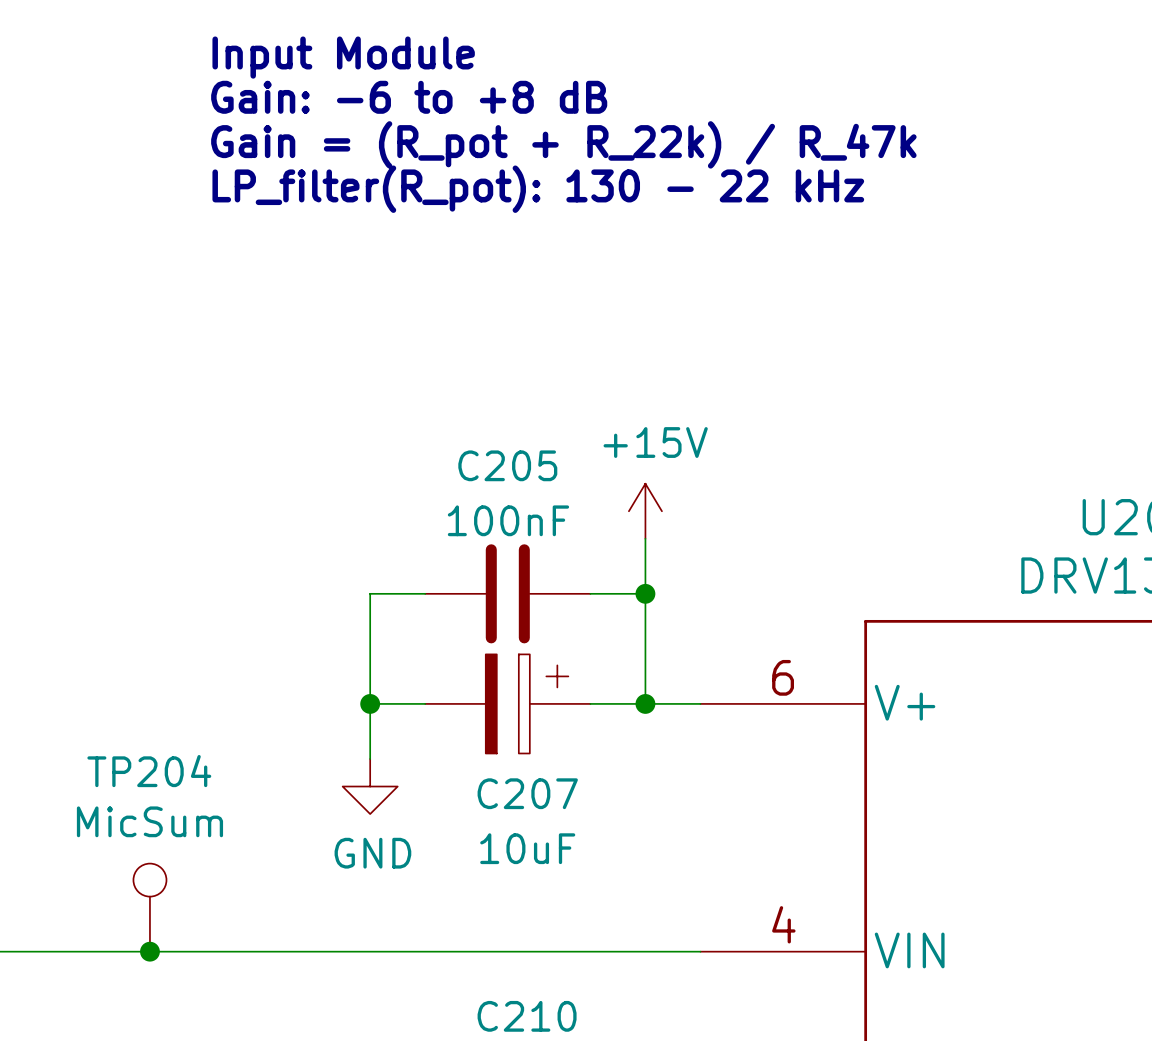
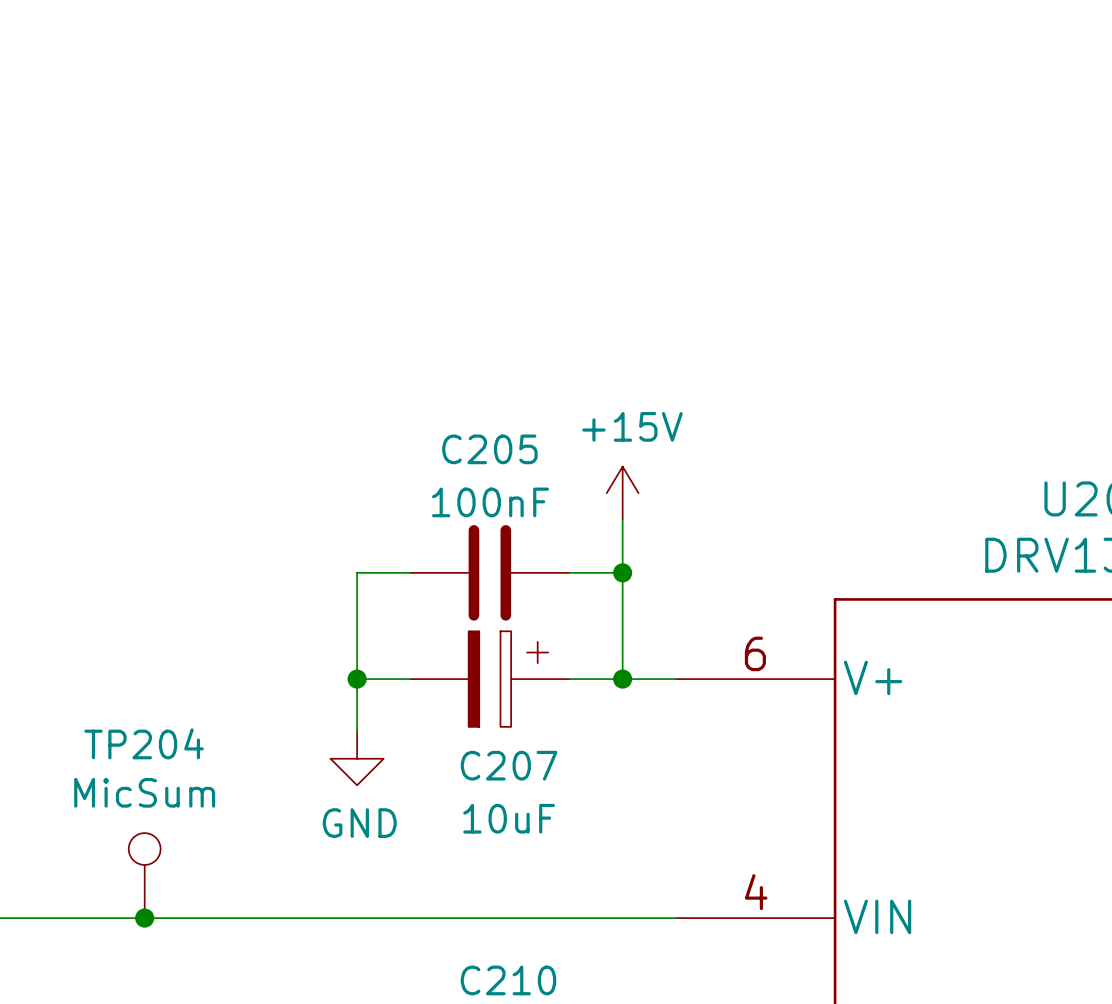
text: Input Module (343, 57) -> none
text: Gain: -6 to +8 dB (409, 97) -> none
text: Gain = (R_pot + R_22k) / R_47k (563, 144) -> none
text: LP_filter(R_pot): 130 - 22 kHz (538, 189) -> none

